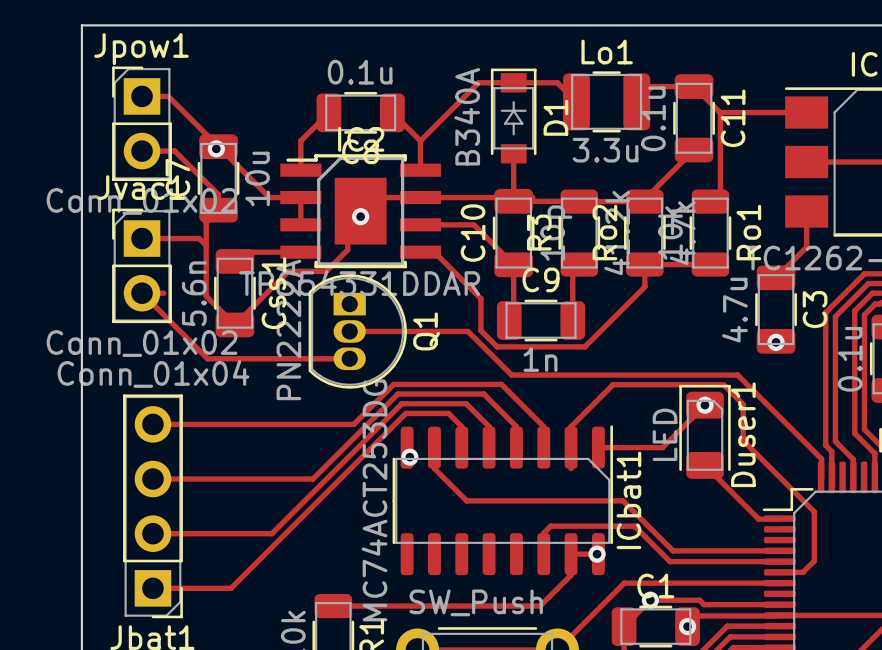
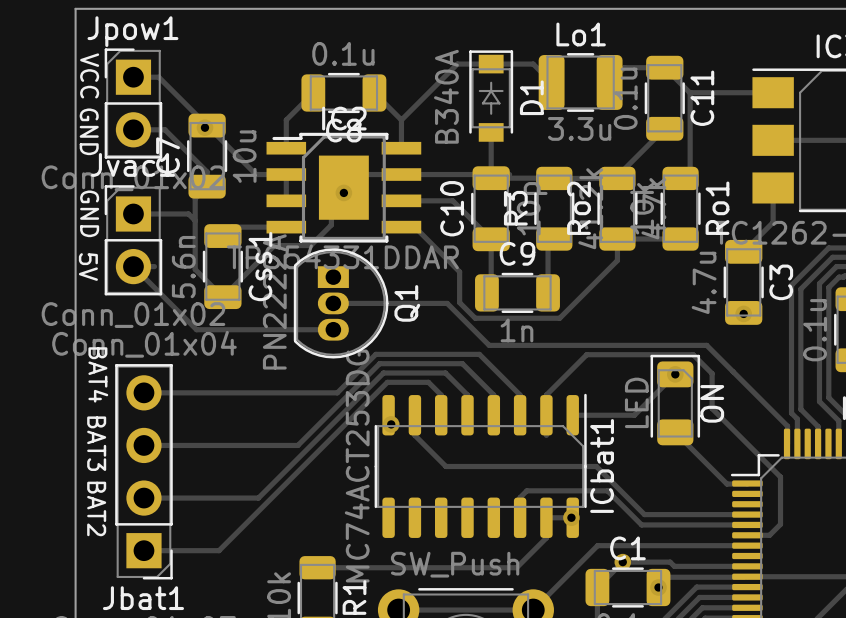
text: none -> VCC (89, 75)
text: none -> GND (89, 131)
text: none -> GND (89, 213)
text: none -> 5V (88, 267)
text: none -> BAT4 (98, 374)
Duser1 name: Duser1 (743, 434) -> ON (712, 403)
text: none -> BAT3 (96, 443)
text: none -> BAT2 (96, 508)

